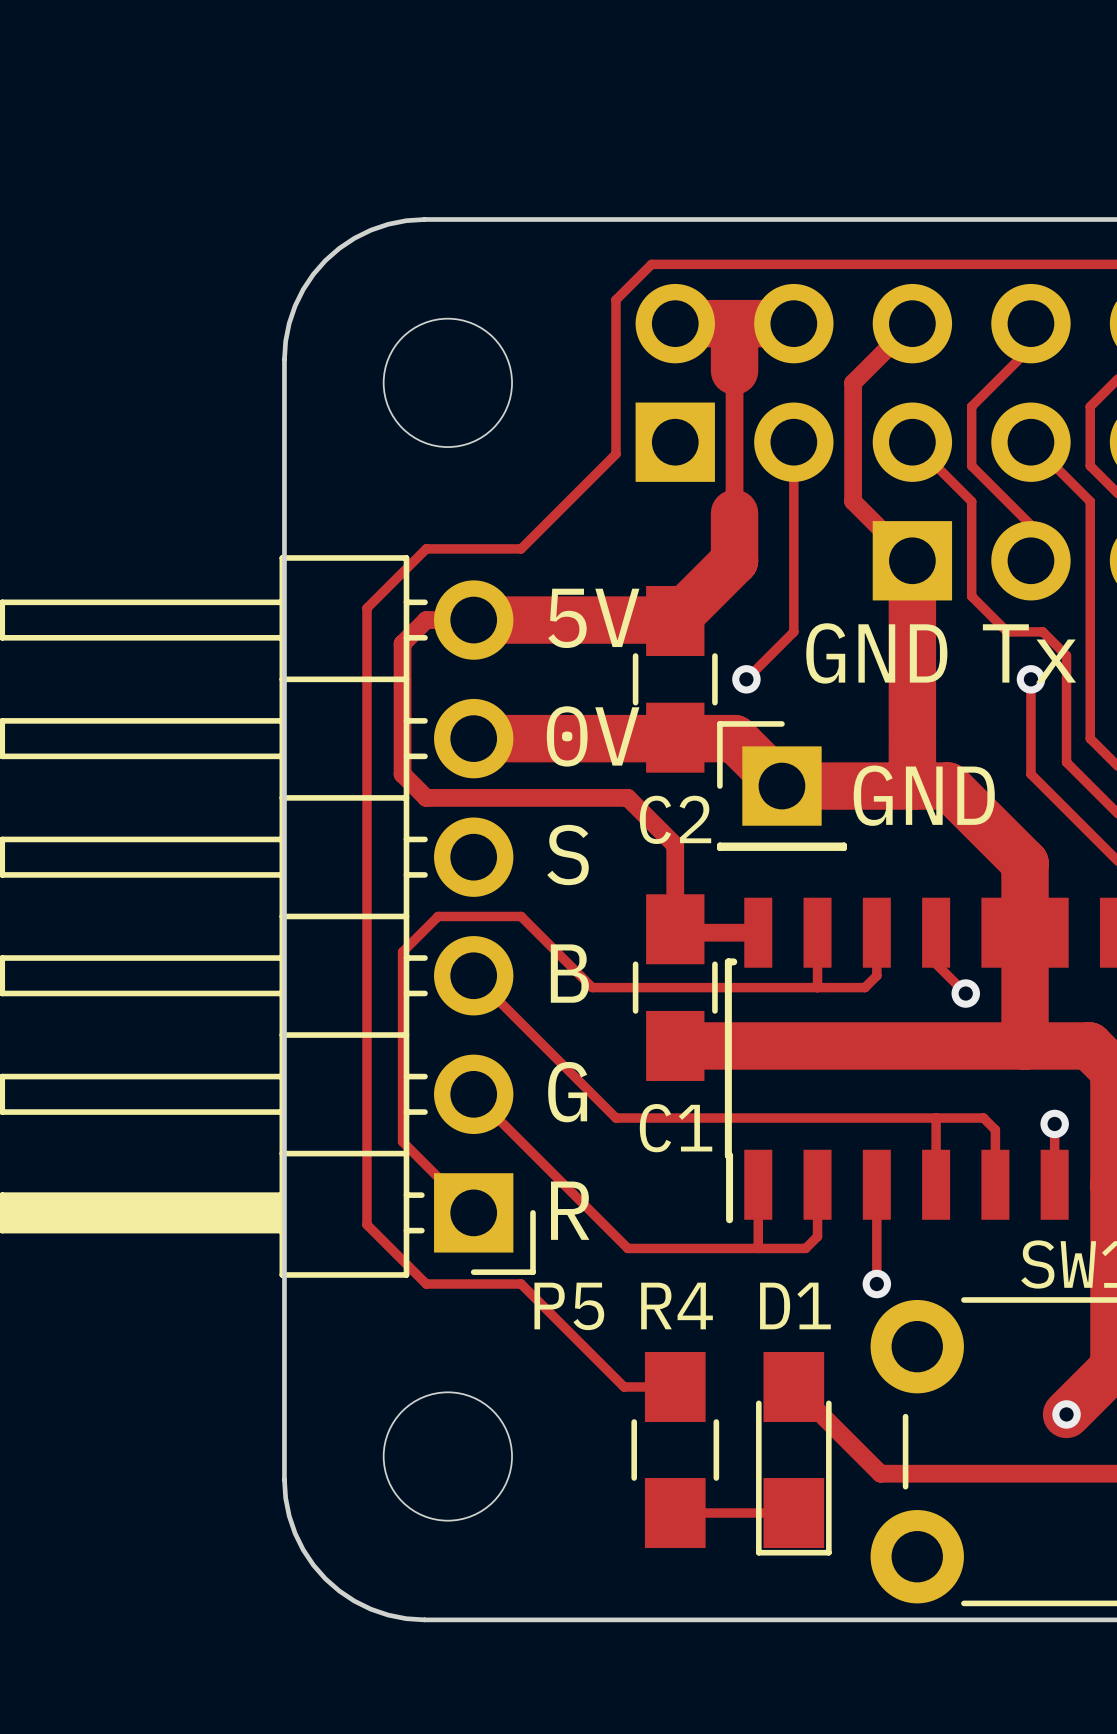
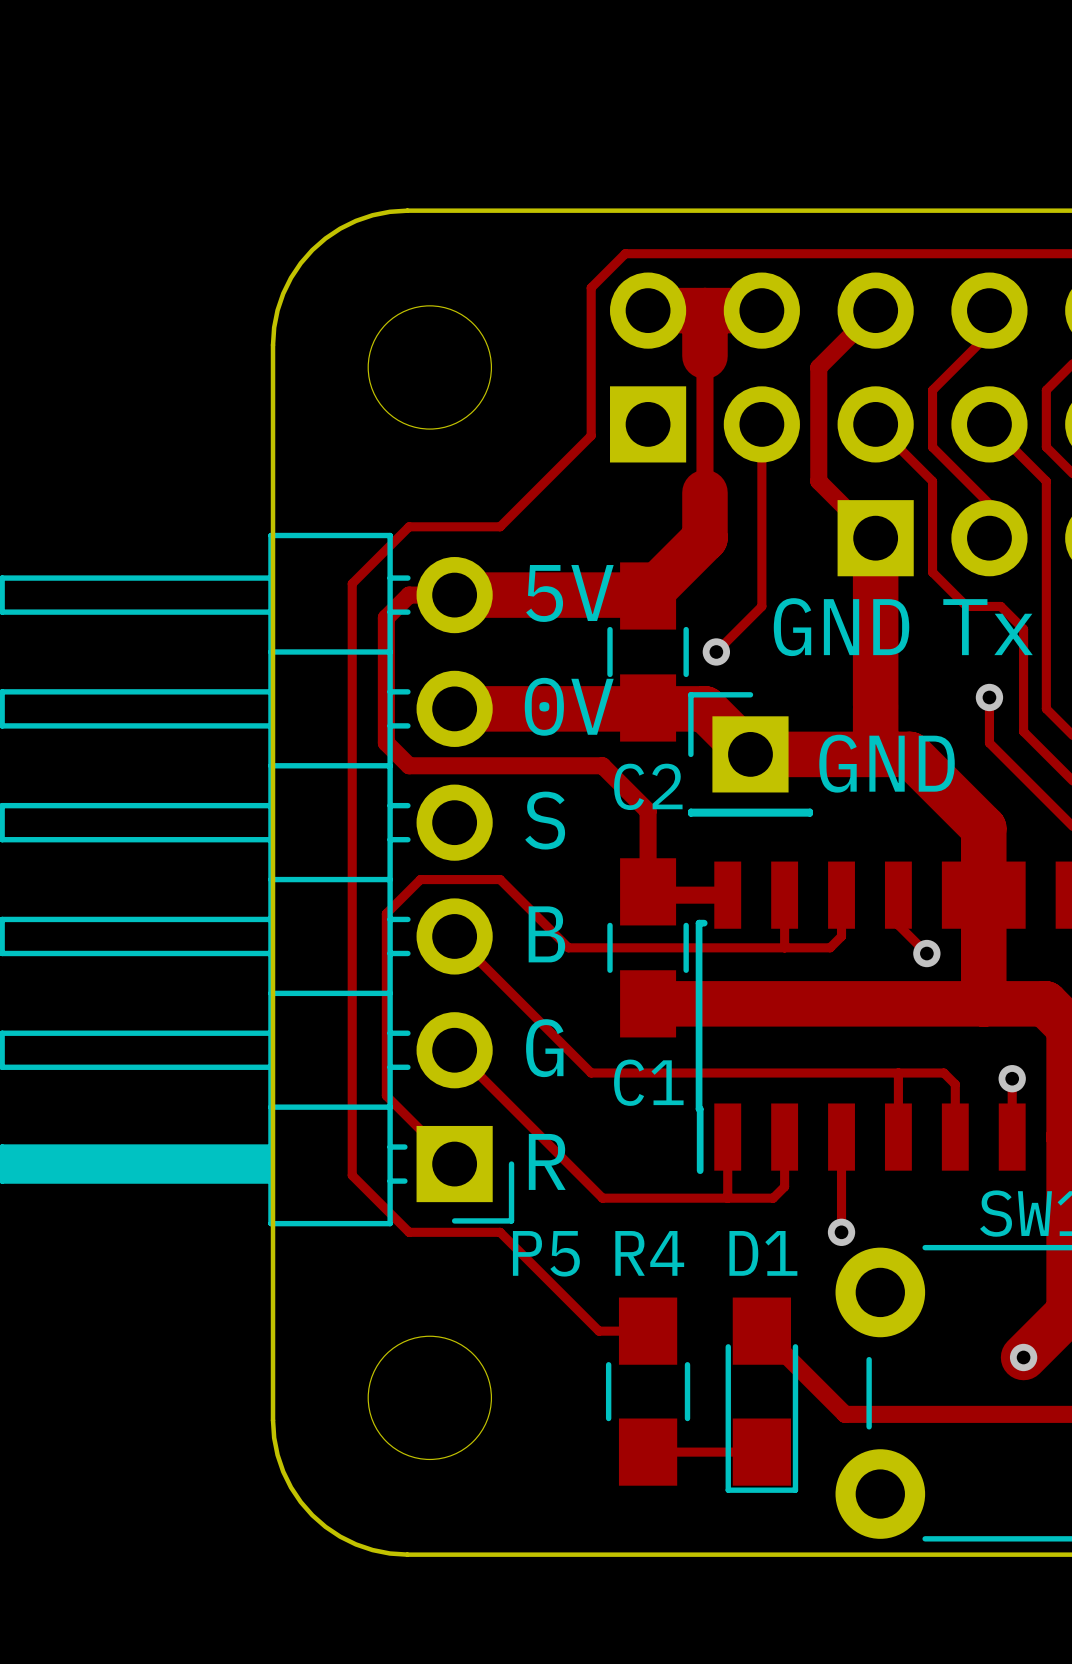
track: (1030, 679) (1030, 726) -> none
via position: (1030, 679) -> (989, 697)

